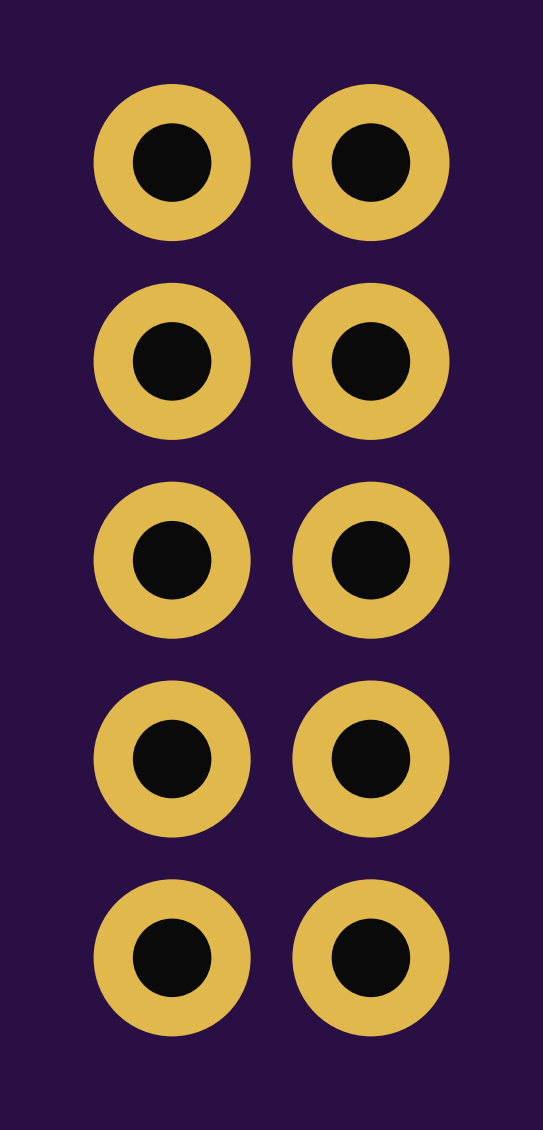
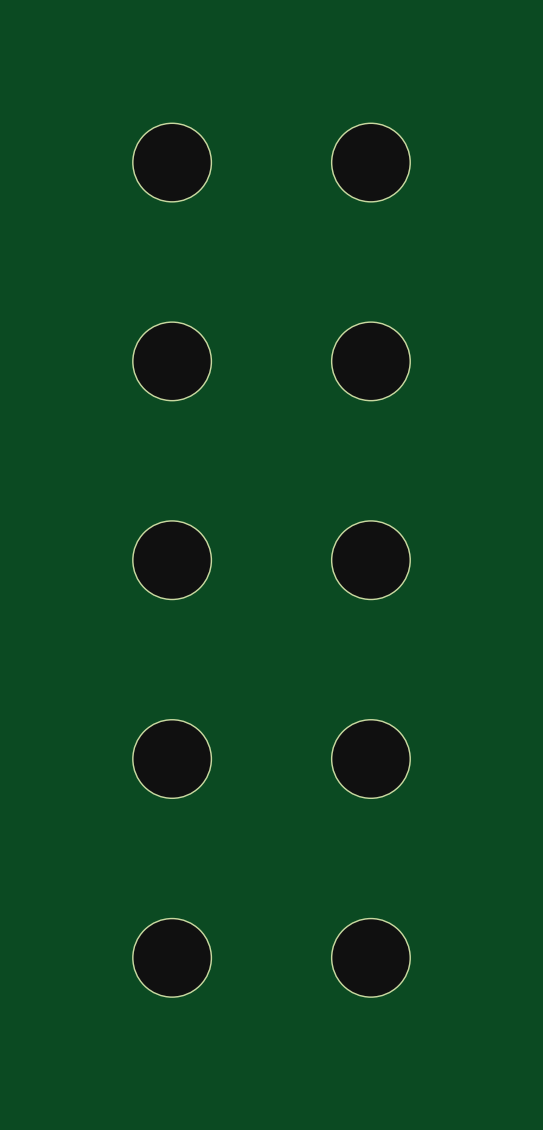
part footprint: [93, 84, 251, 242] -> [132, 123, 212, 202]
part footprint: [292, 84, 450, 242] -> [331, 123, 411, 202]
part footprint: [93, 282, 251, 440] -> [132, 322, 212, 401]
part footprint: [292, 282, 450, 440] -> [331, 322, 411, 401]
part footprint: [93, 481, 251, 639] -> [132, 520, 212, 600]
part footprint: [292, 481, 450, 639] -> [331, 520, 411, 600]
part footprint: [93, 680, 251, 838] -> [132, 719, 212, 799]
part footprint: [292, 680, 450, 838] -> [331, 719, 411, 799]
part footprint: [93, 879, 251, 1037] -> [132, 918, 212, 998]
part footprint: [292, 879, 450, 1037] -> [331, 918, 411, 998]

